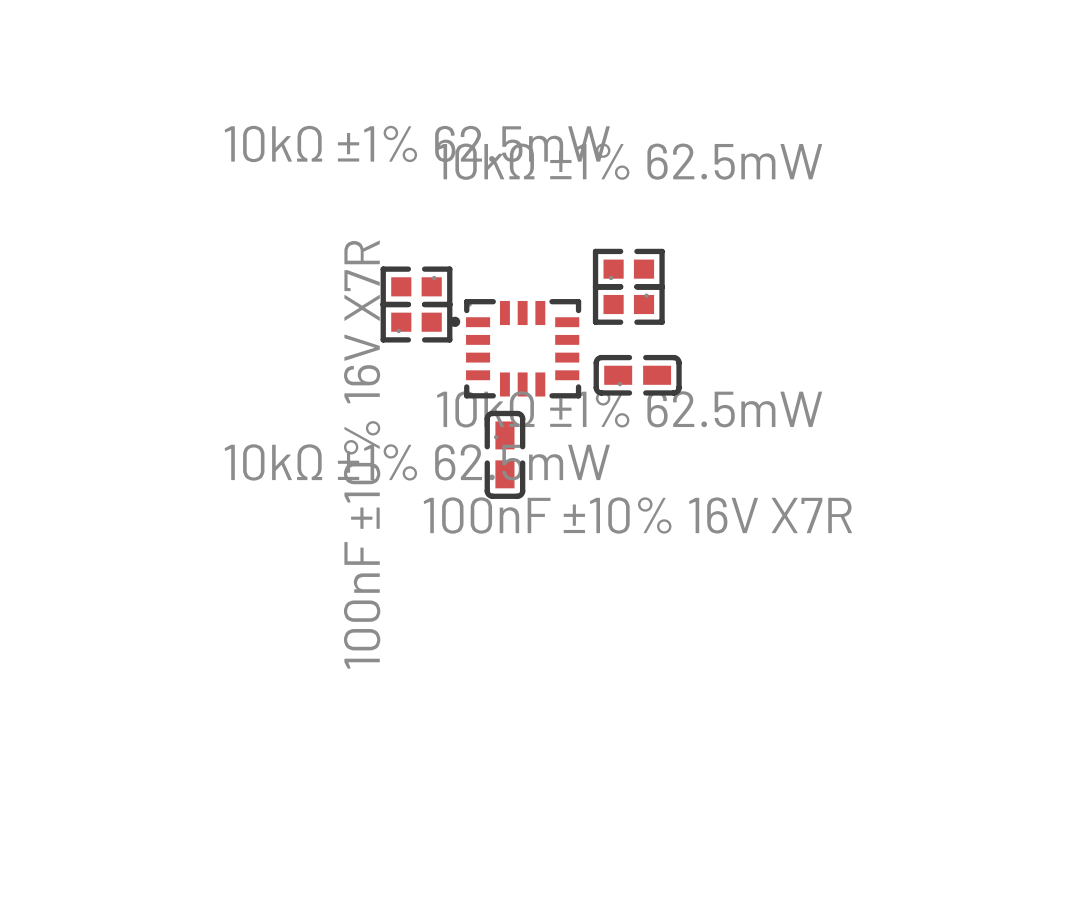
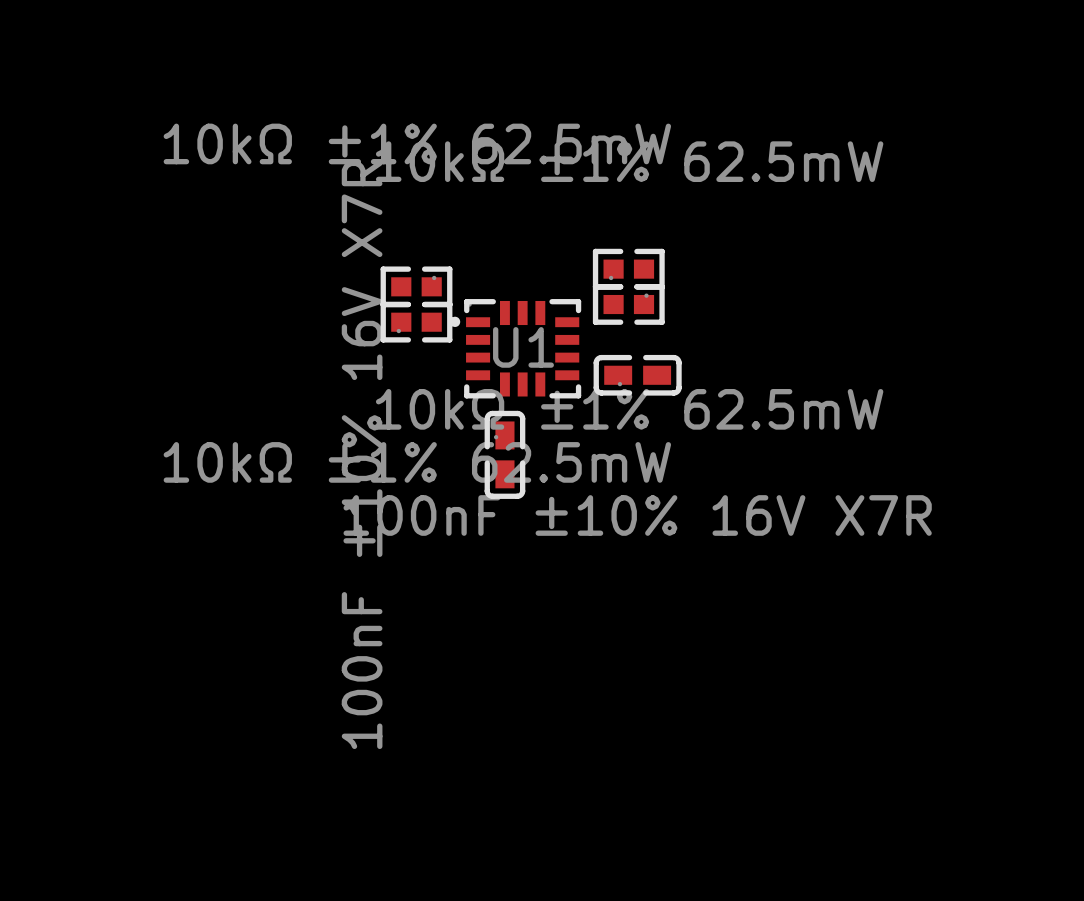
U1 name: none -> U1 (523, 347)

